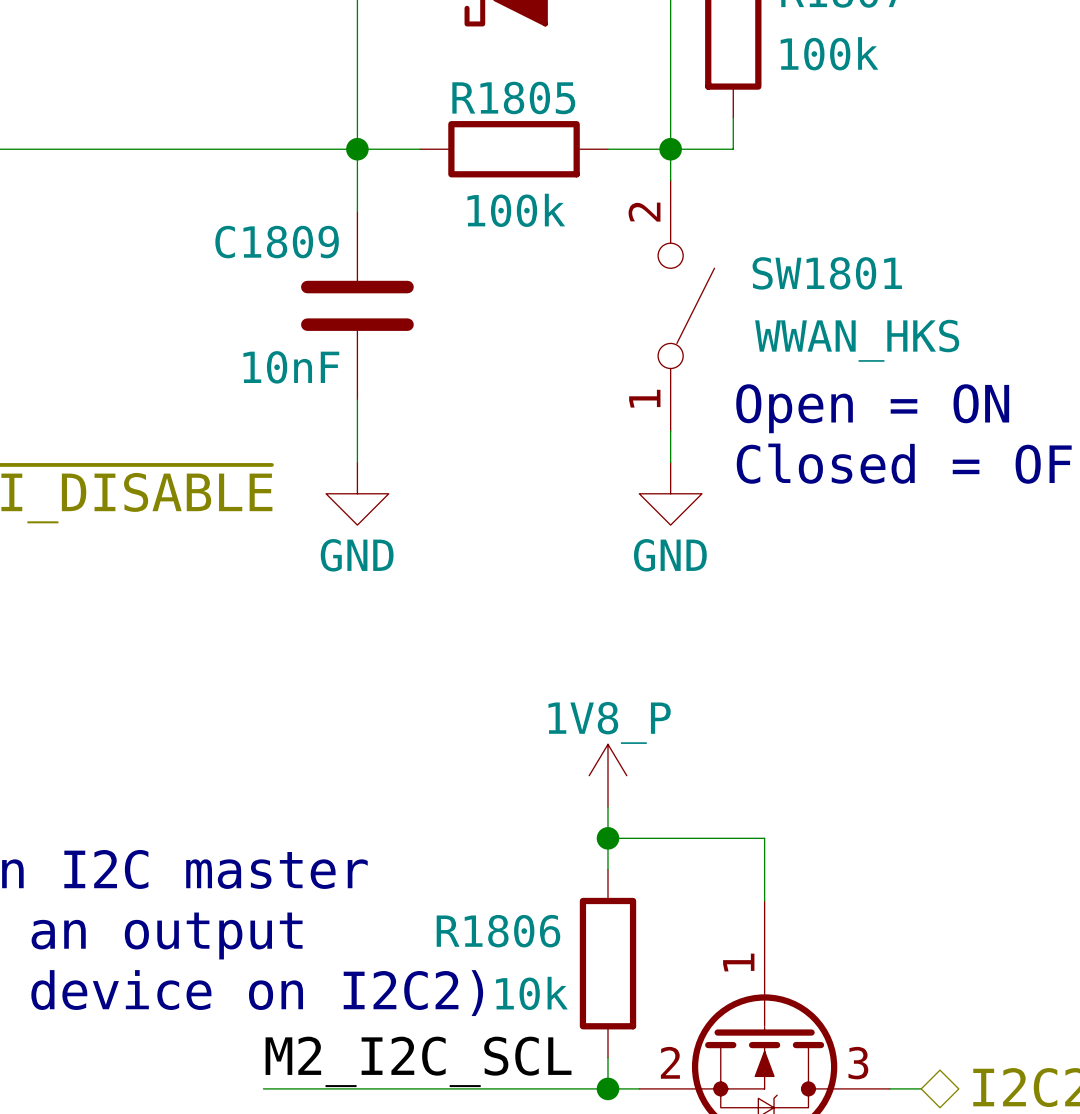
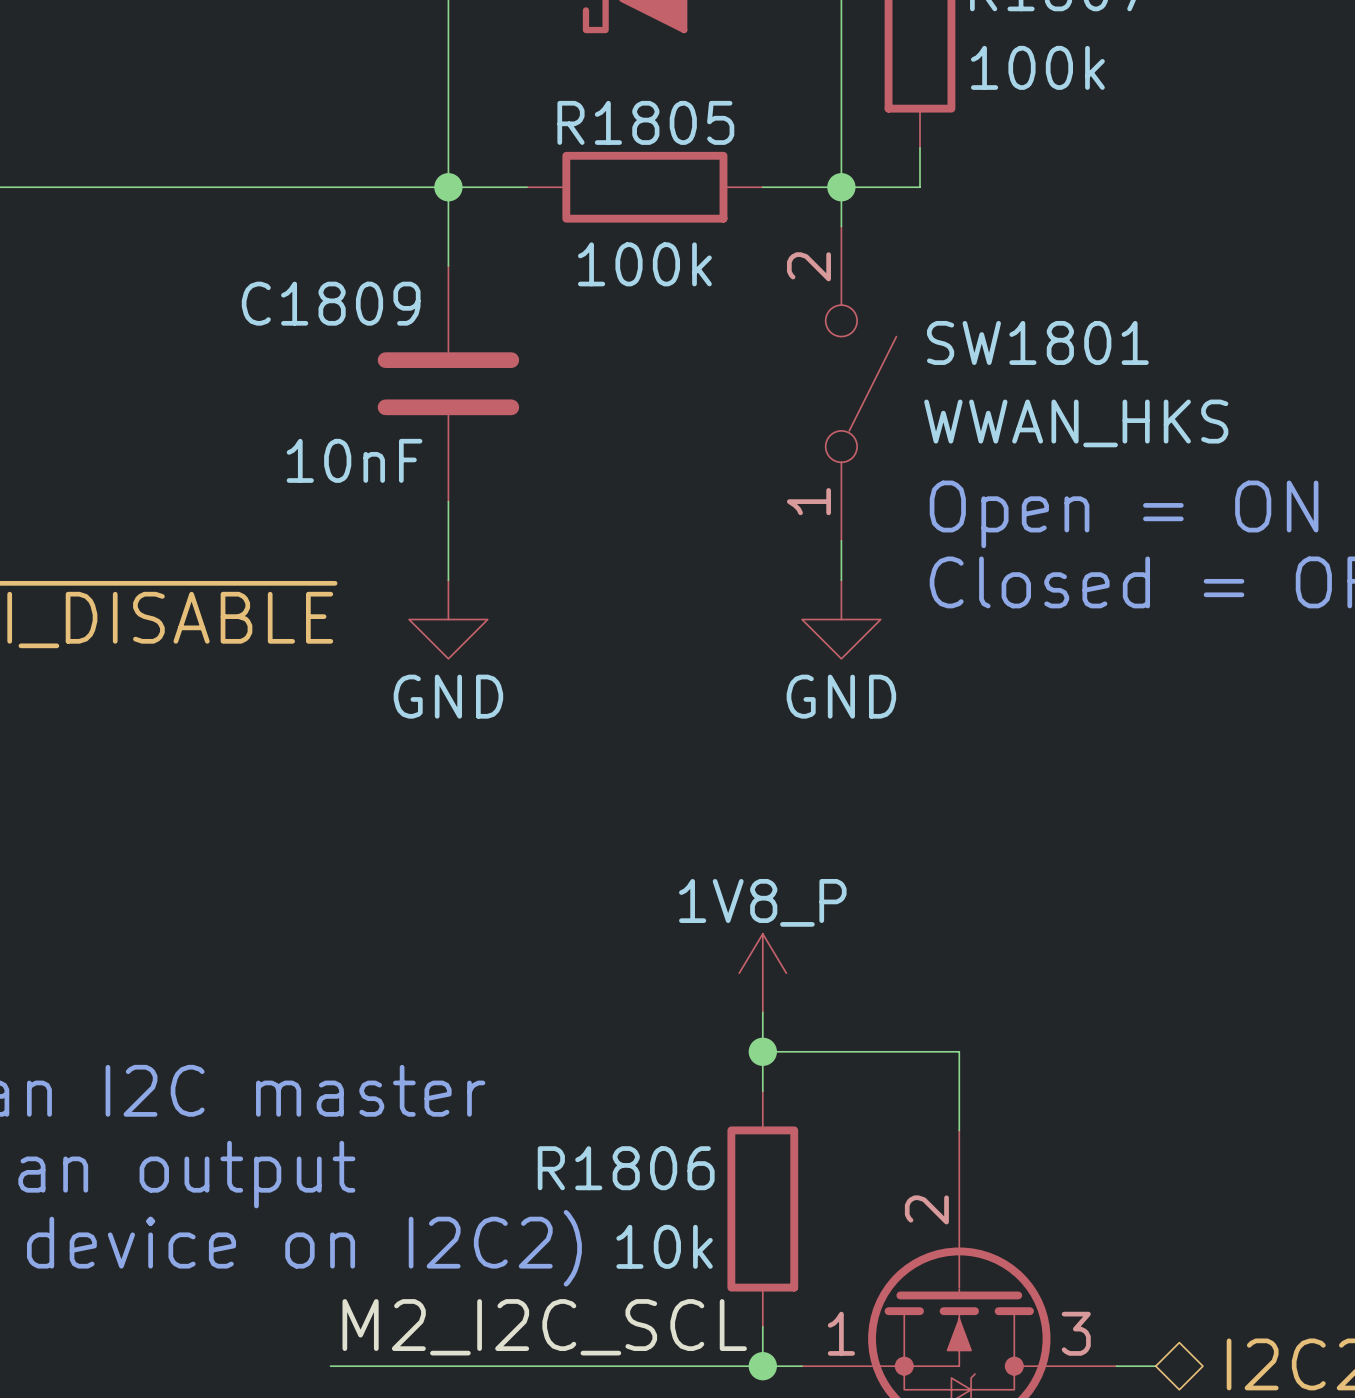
part pin number: 1 (738, 962) -> 2 (926, 1209)
part pin number: 2 (670, 1062) -> 1 (841, 1333)

